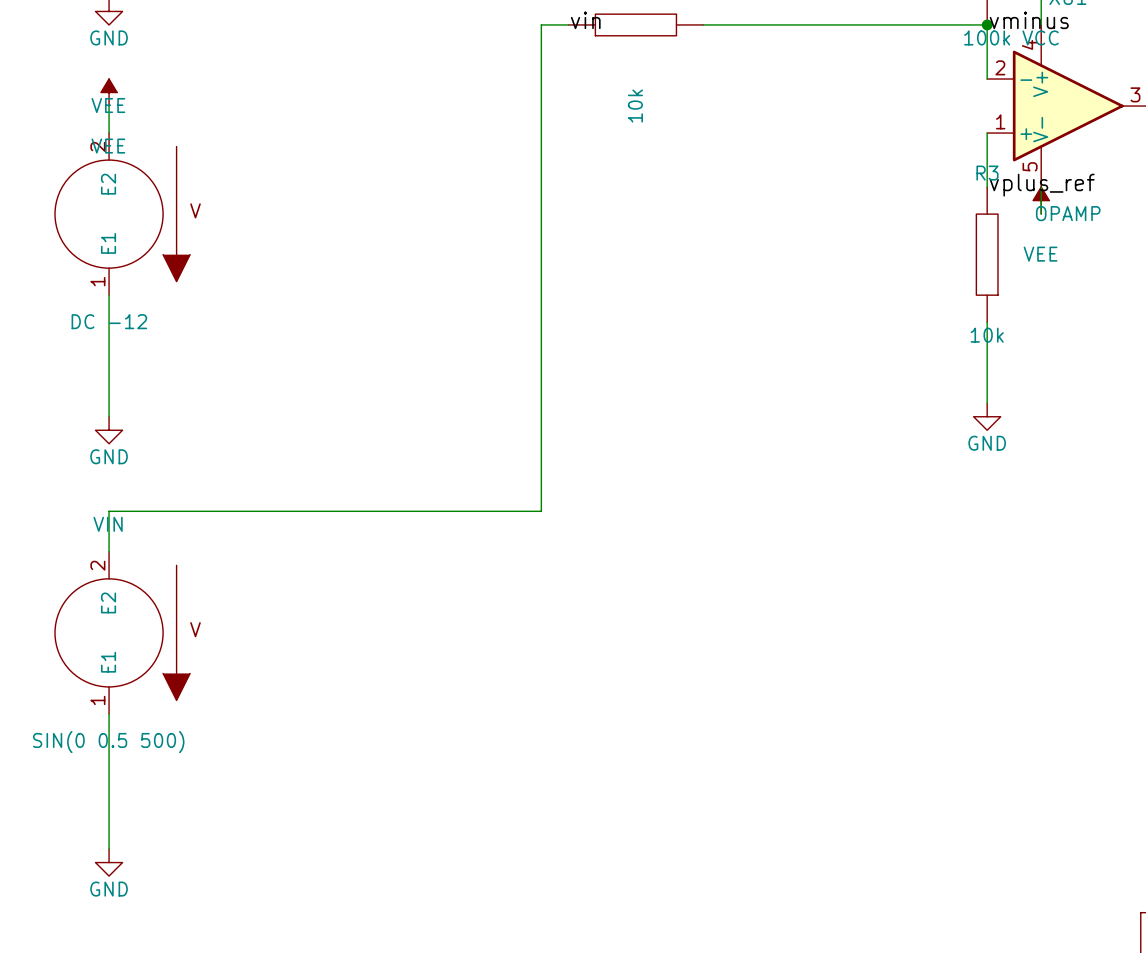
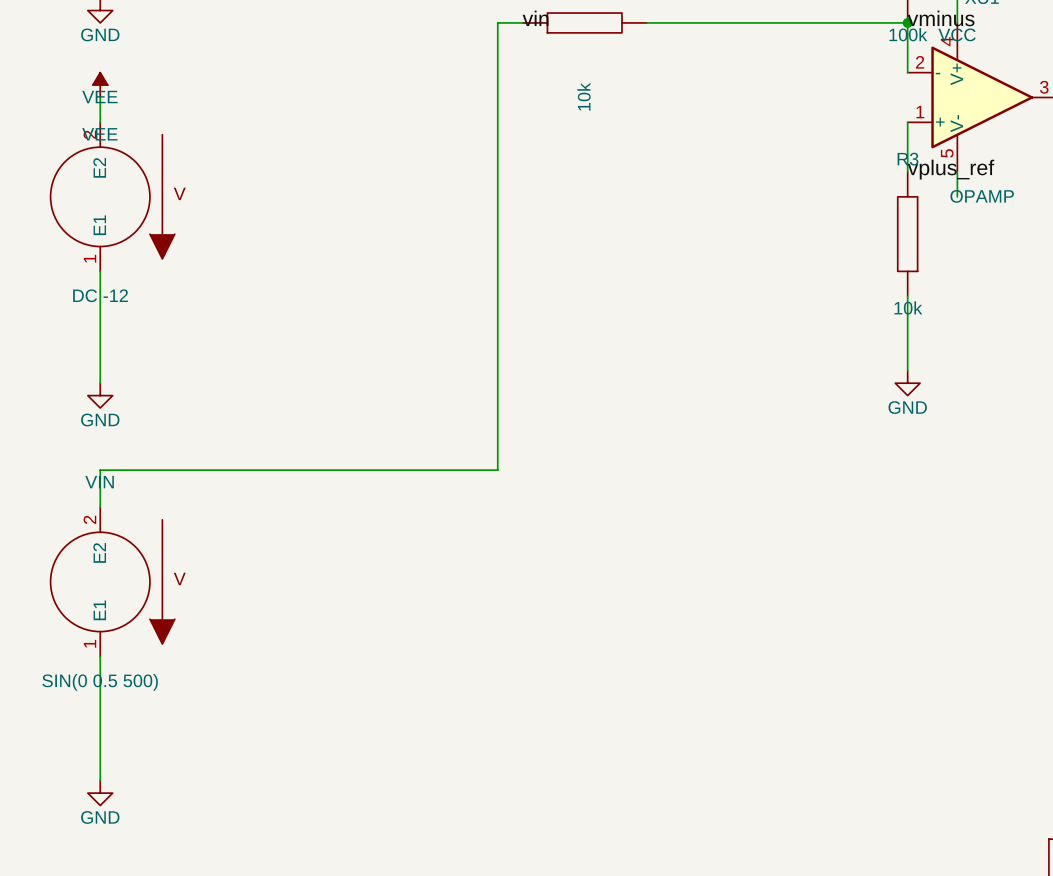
power symbol: VEE (1041, 200) -> none

